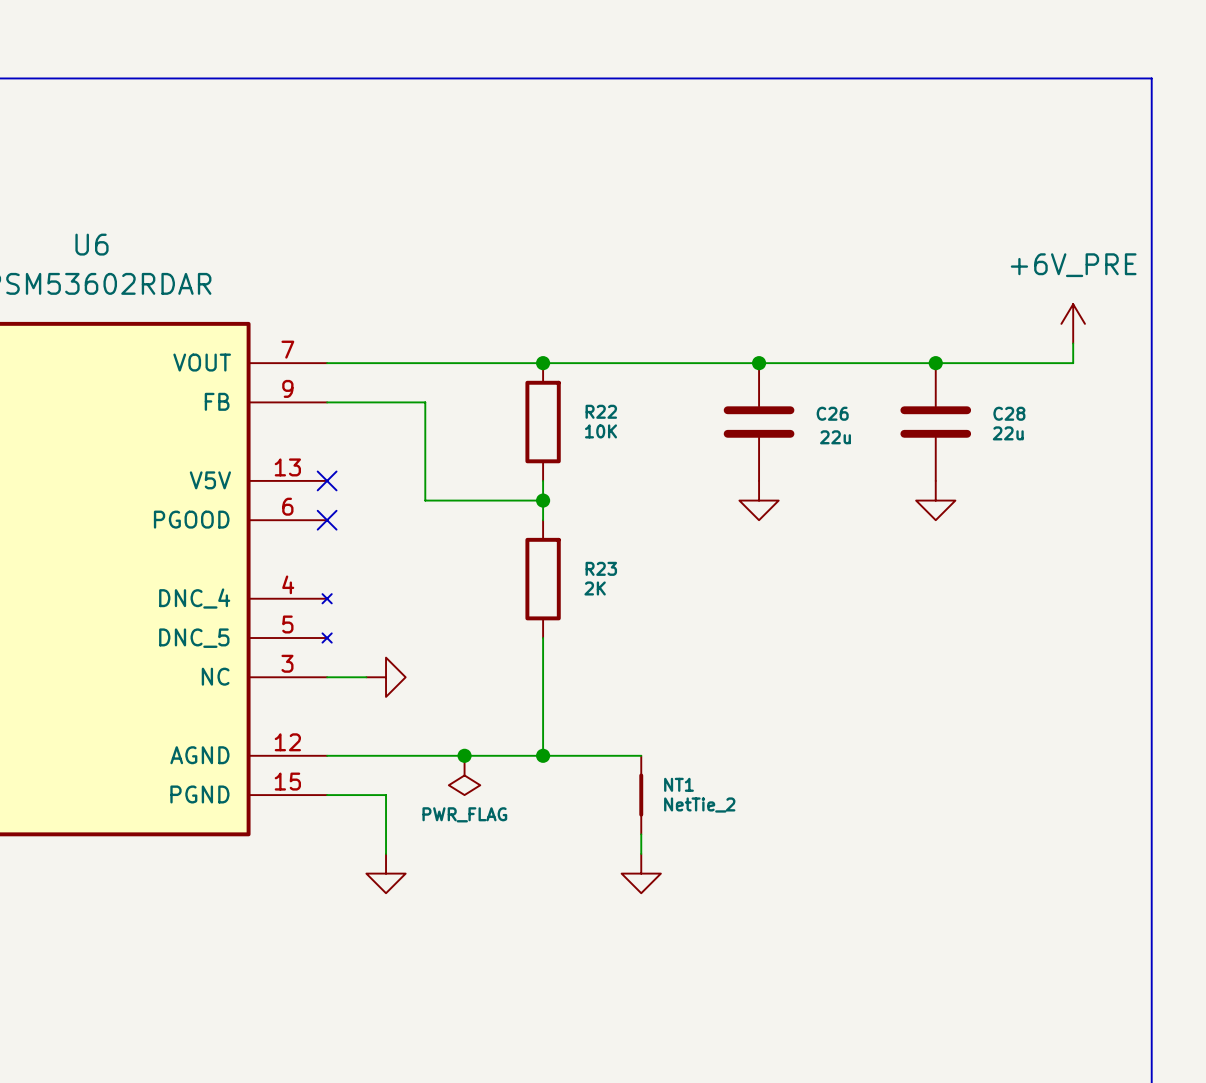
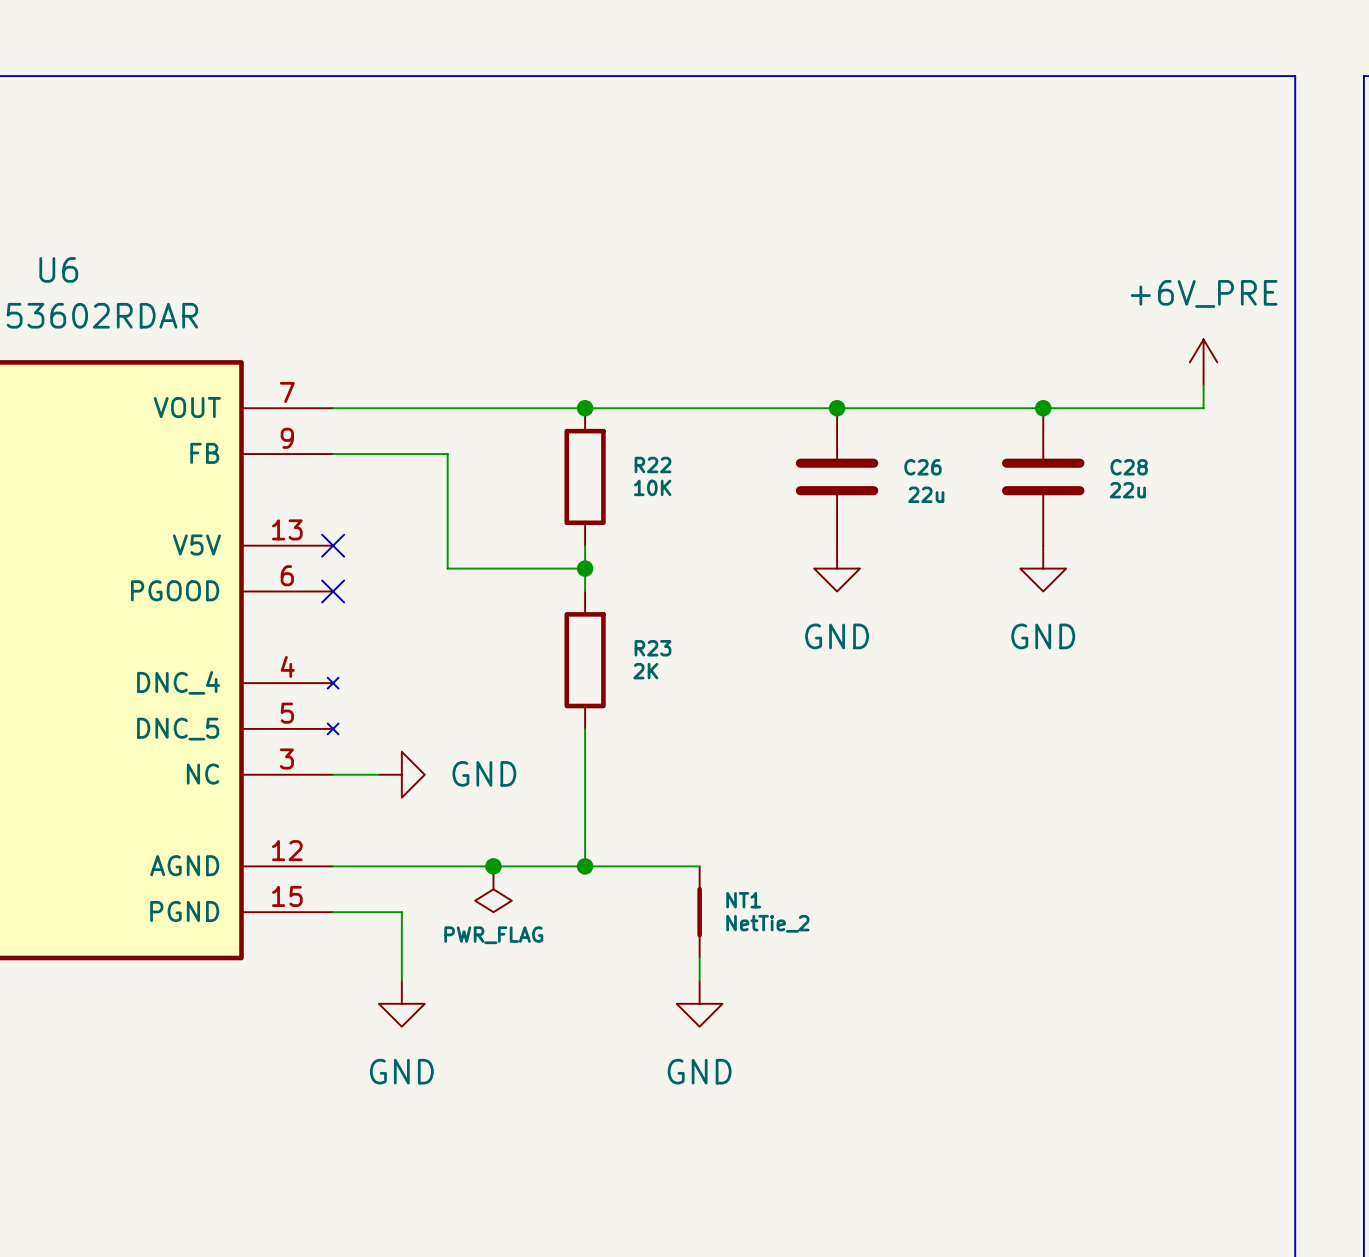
power symbol text: none -> GND (837, 636)
power symbol text: none -> GND (1043, 636)
power symbol text: none -> GND (484, 773)
power symbol text: none -> GND (401, 1071)
power symbol text: none -> GND (699, 1071)

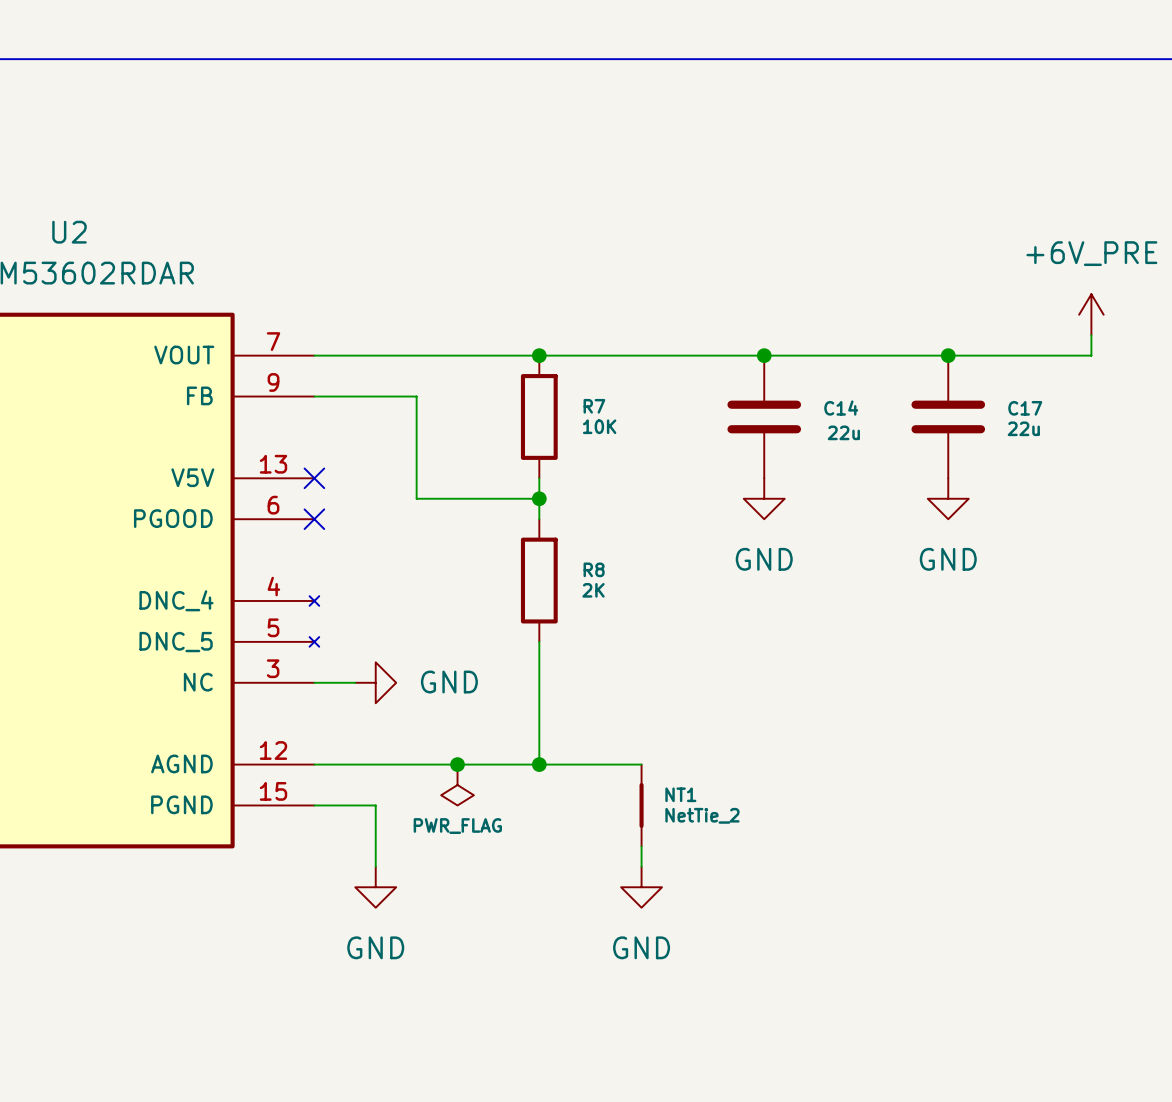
U6 name: U6 (58, 269) -> U2 (69, 232)
R22 name: R22 (653, 464) -> R7 (594, 406)
C26 name: C26 (922, 467) -> C14 (841, 408)
C28 name: C28 (1129, 467) -> C17 (1025, 408)
R23 name: R23 (653, 648) -> R8 (594, 569)

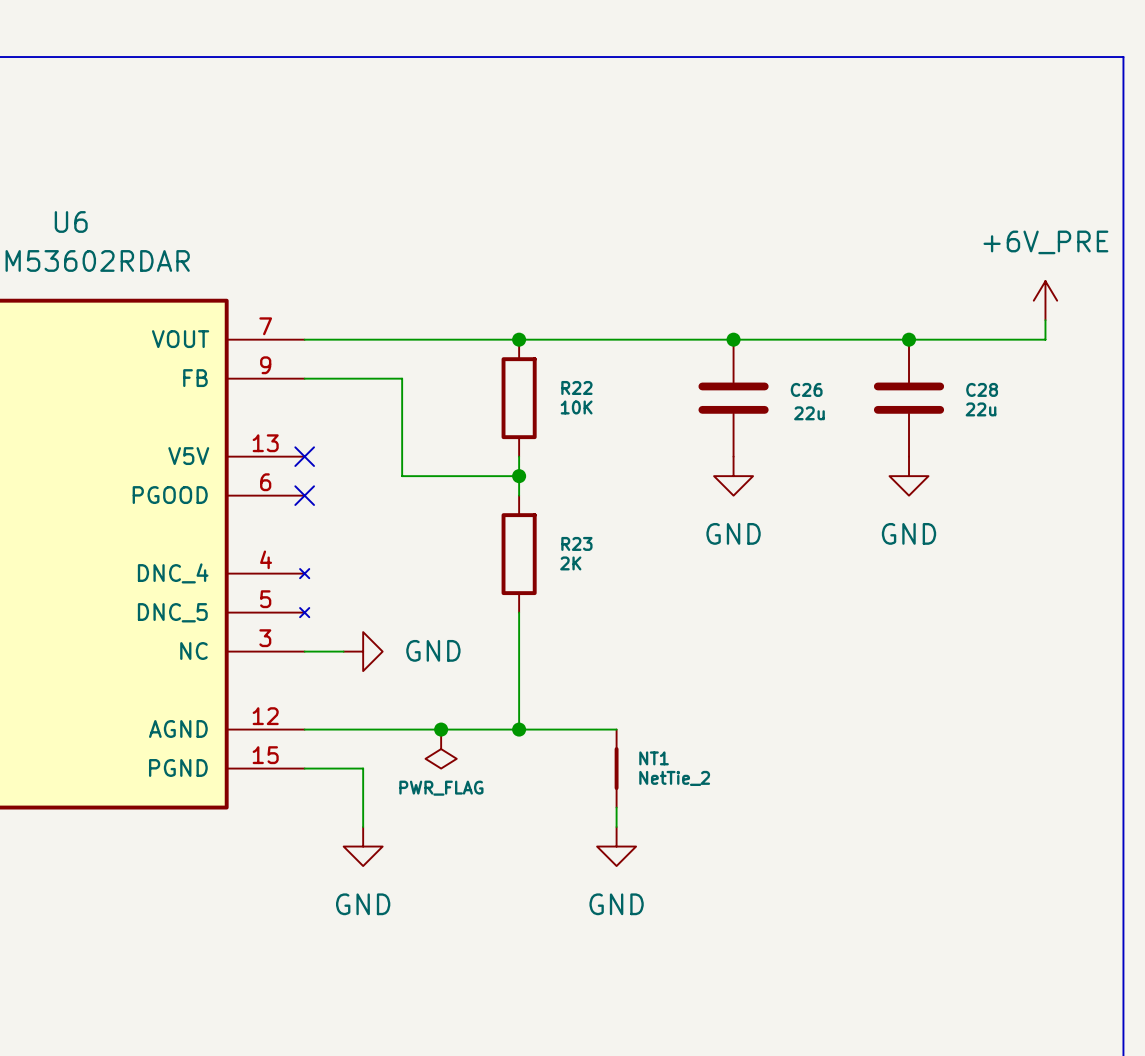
U2 name: U2 (69, 232) -> U6 (71, 221)
R7 name: R7 (594, 406) -> R22 (576, 387)
C14 name: C14 (841, 408) -> C26 (806, 389)
C17 name: C17 (1025, 408) -> C28 (982, 389)
R8 name: R8 (594, 569) -> R23 (576, 543)

